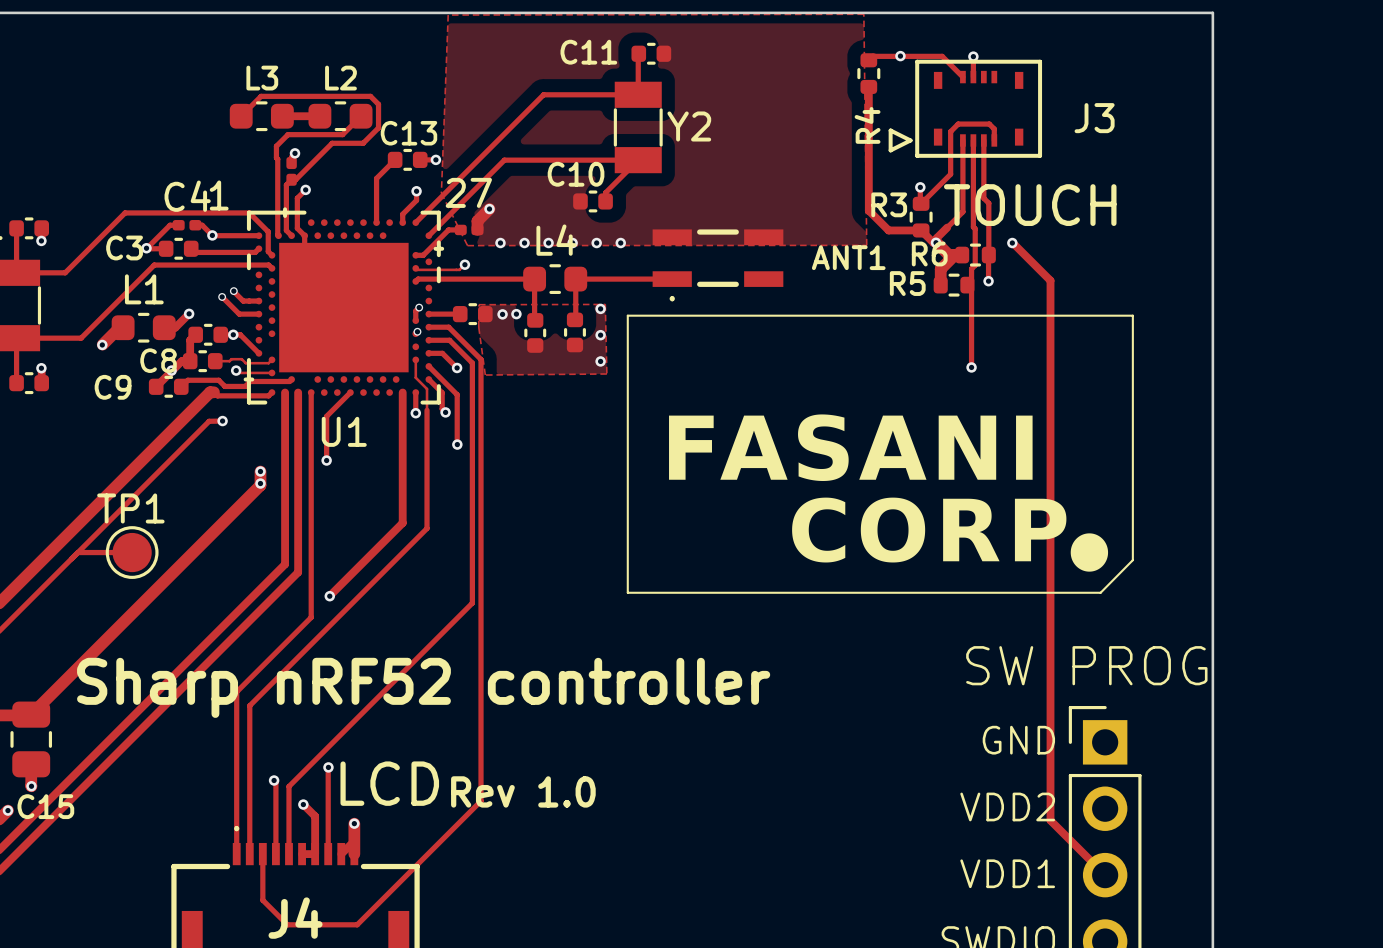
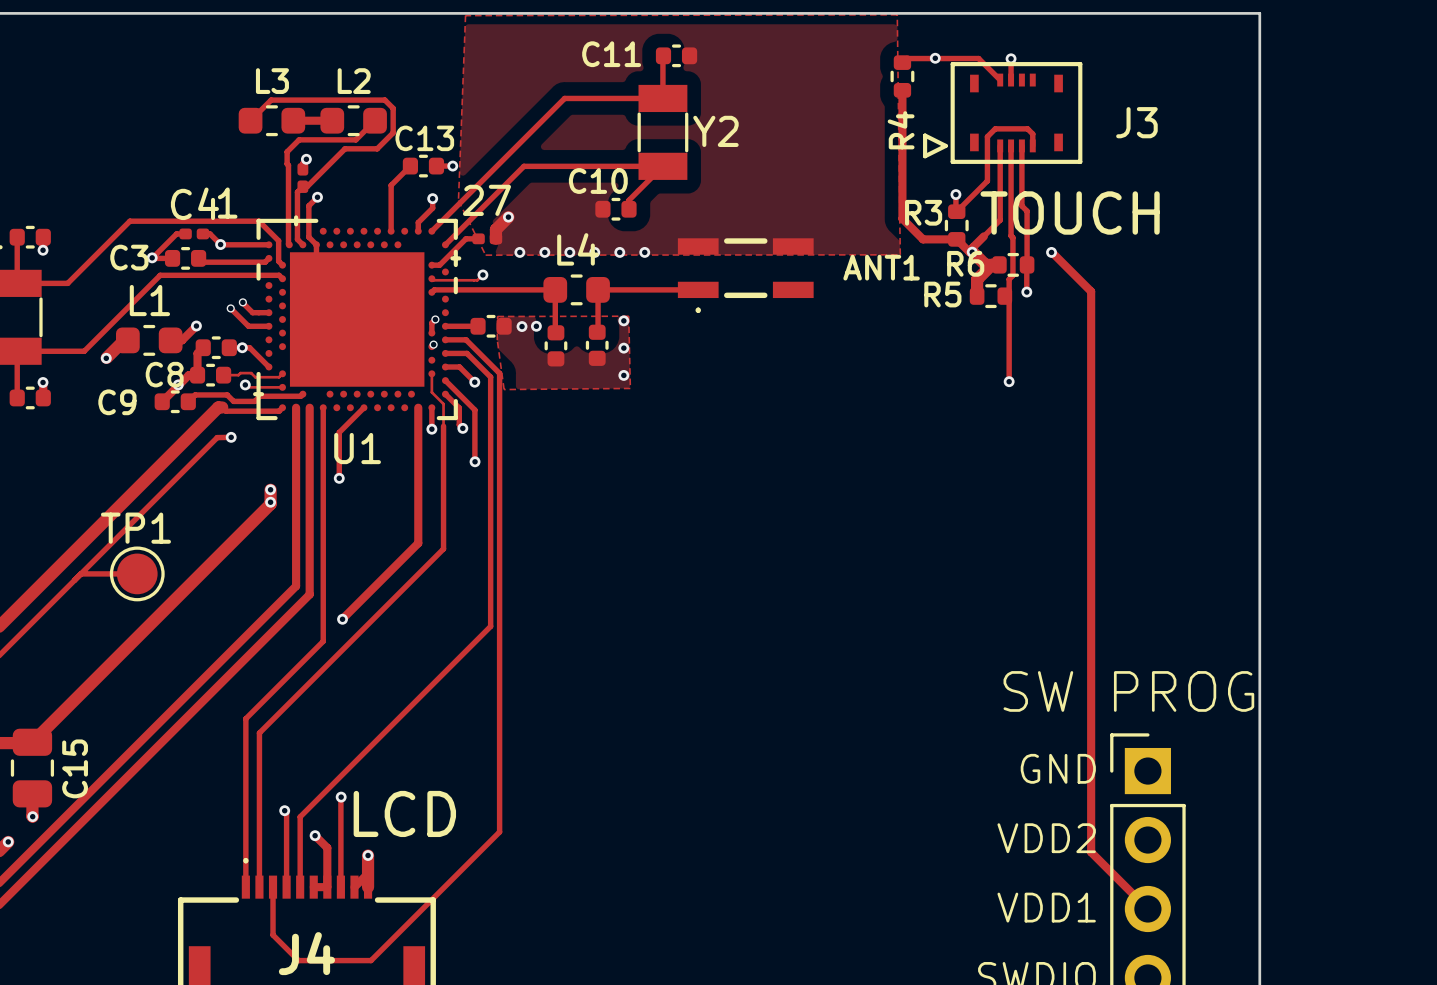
line: (627, 315) (1132, 315) (1132, 560) (1100, 592) (627, 592) (627, 315) -> none
drawing: [669, 414, 1109, 572] -> none
text: Sharp nRF52 controller (423, 687) -> none
text: Rev 1.0 (523, 791) -> none
C15 name rotation: 0° (45, 806) -> 90° counterclockwise (75, 768)

